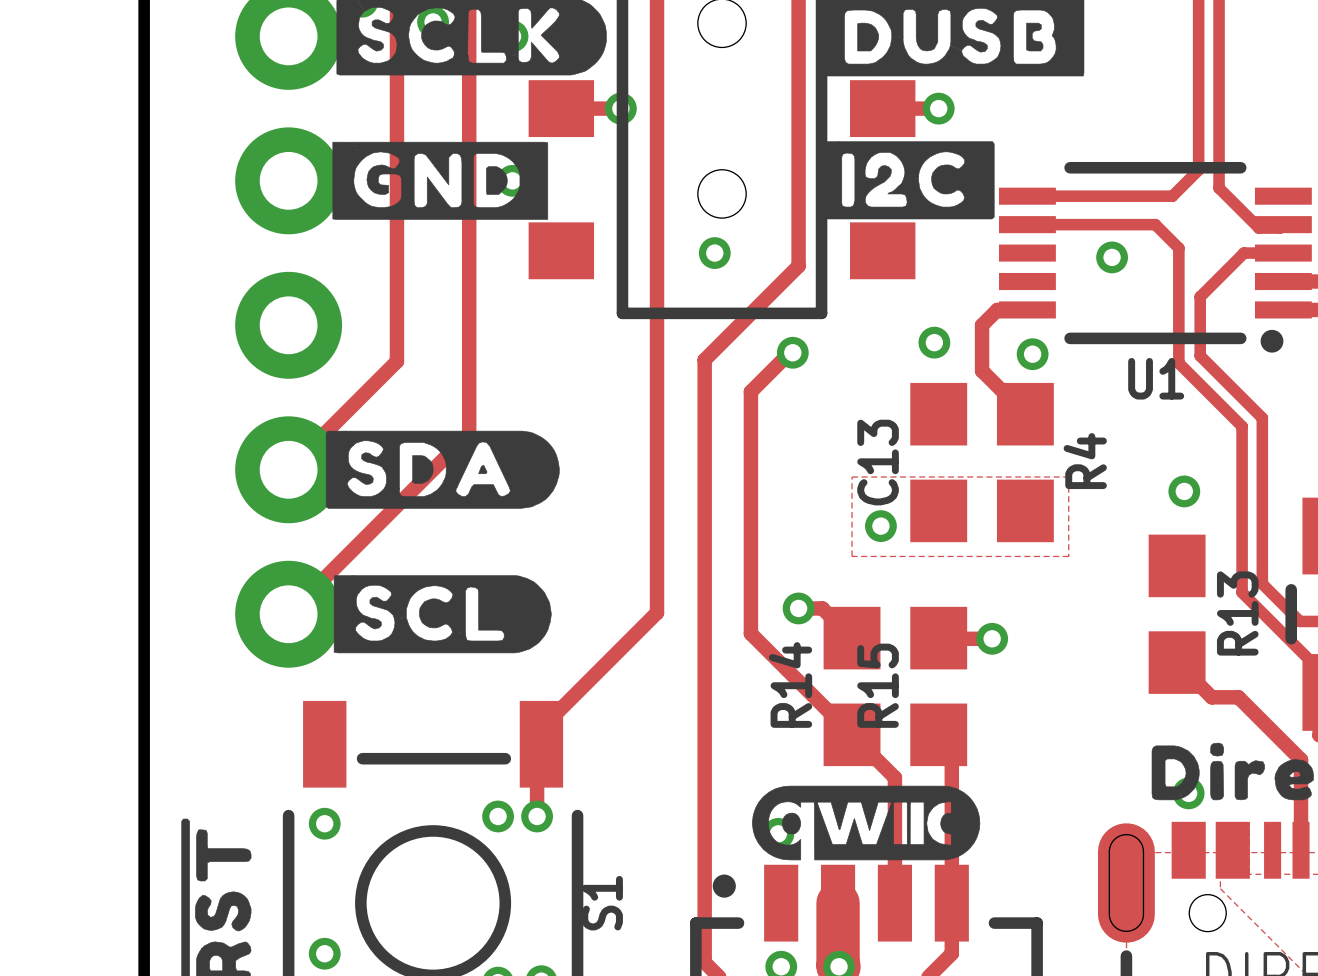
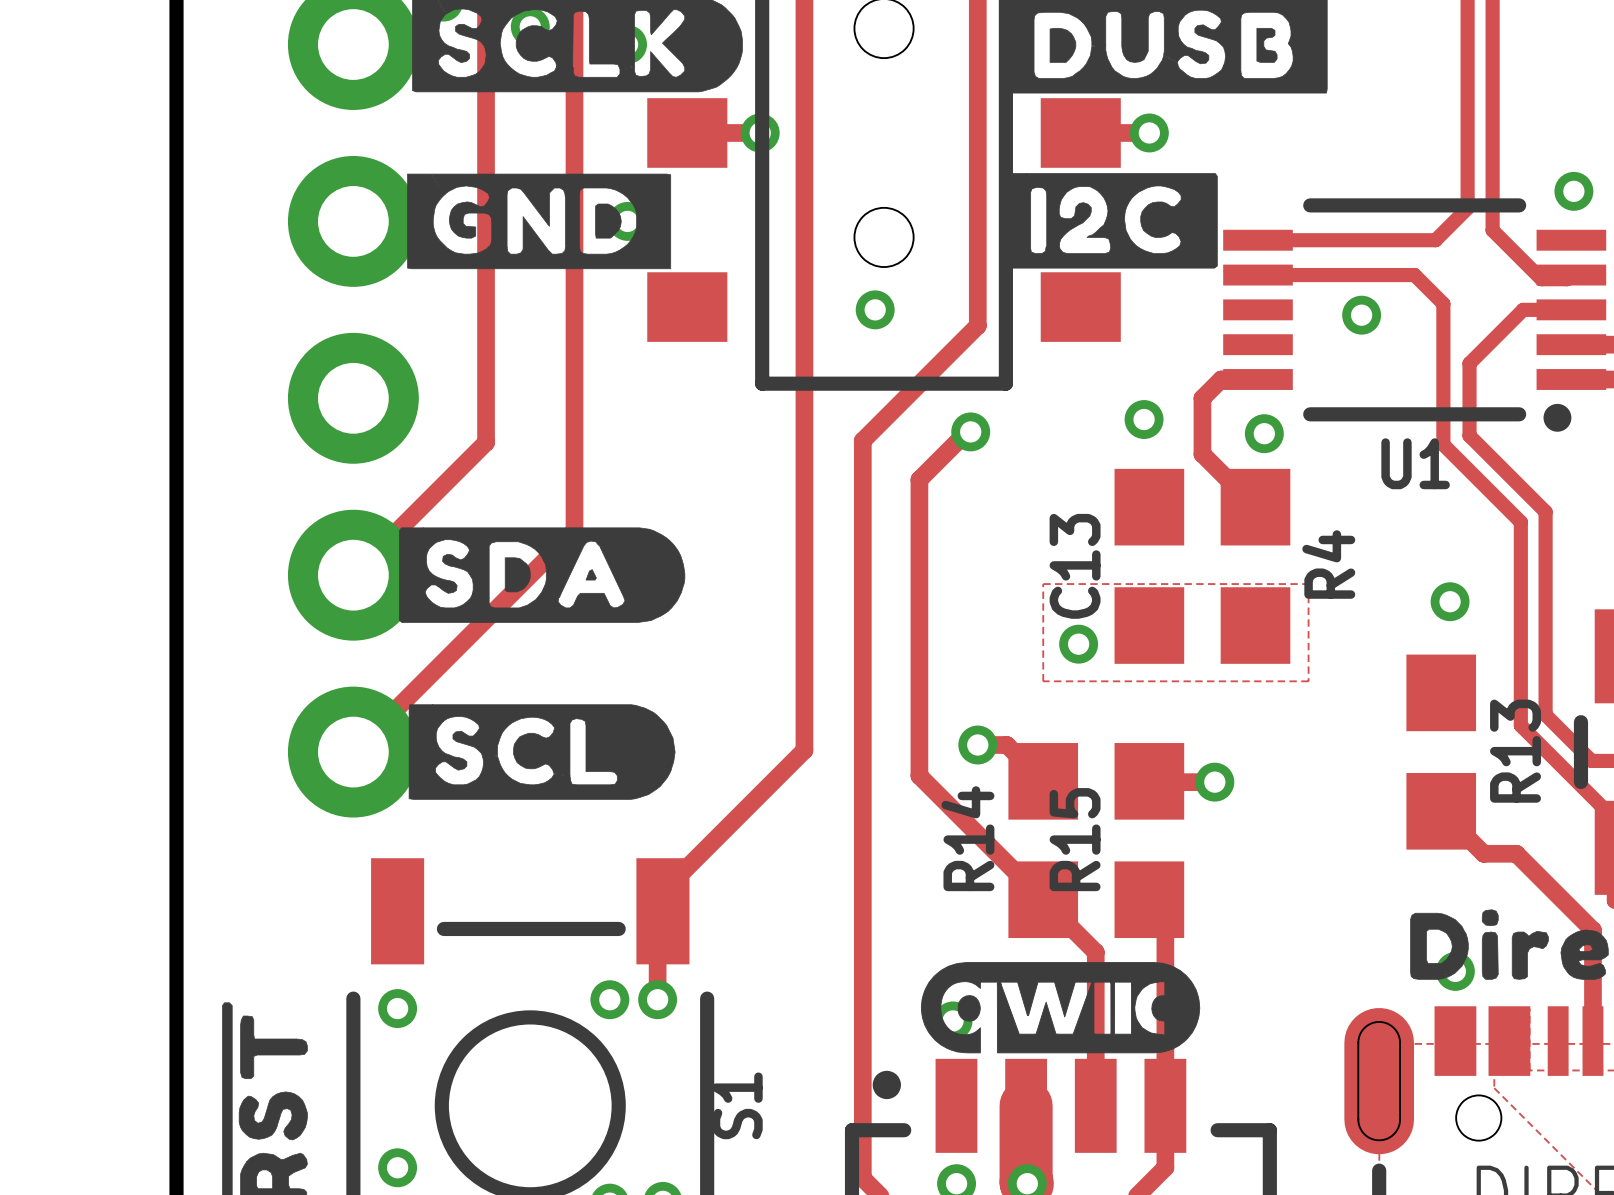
via: none -> (1573, 191)

